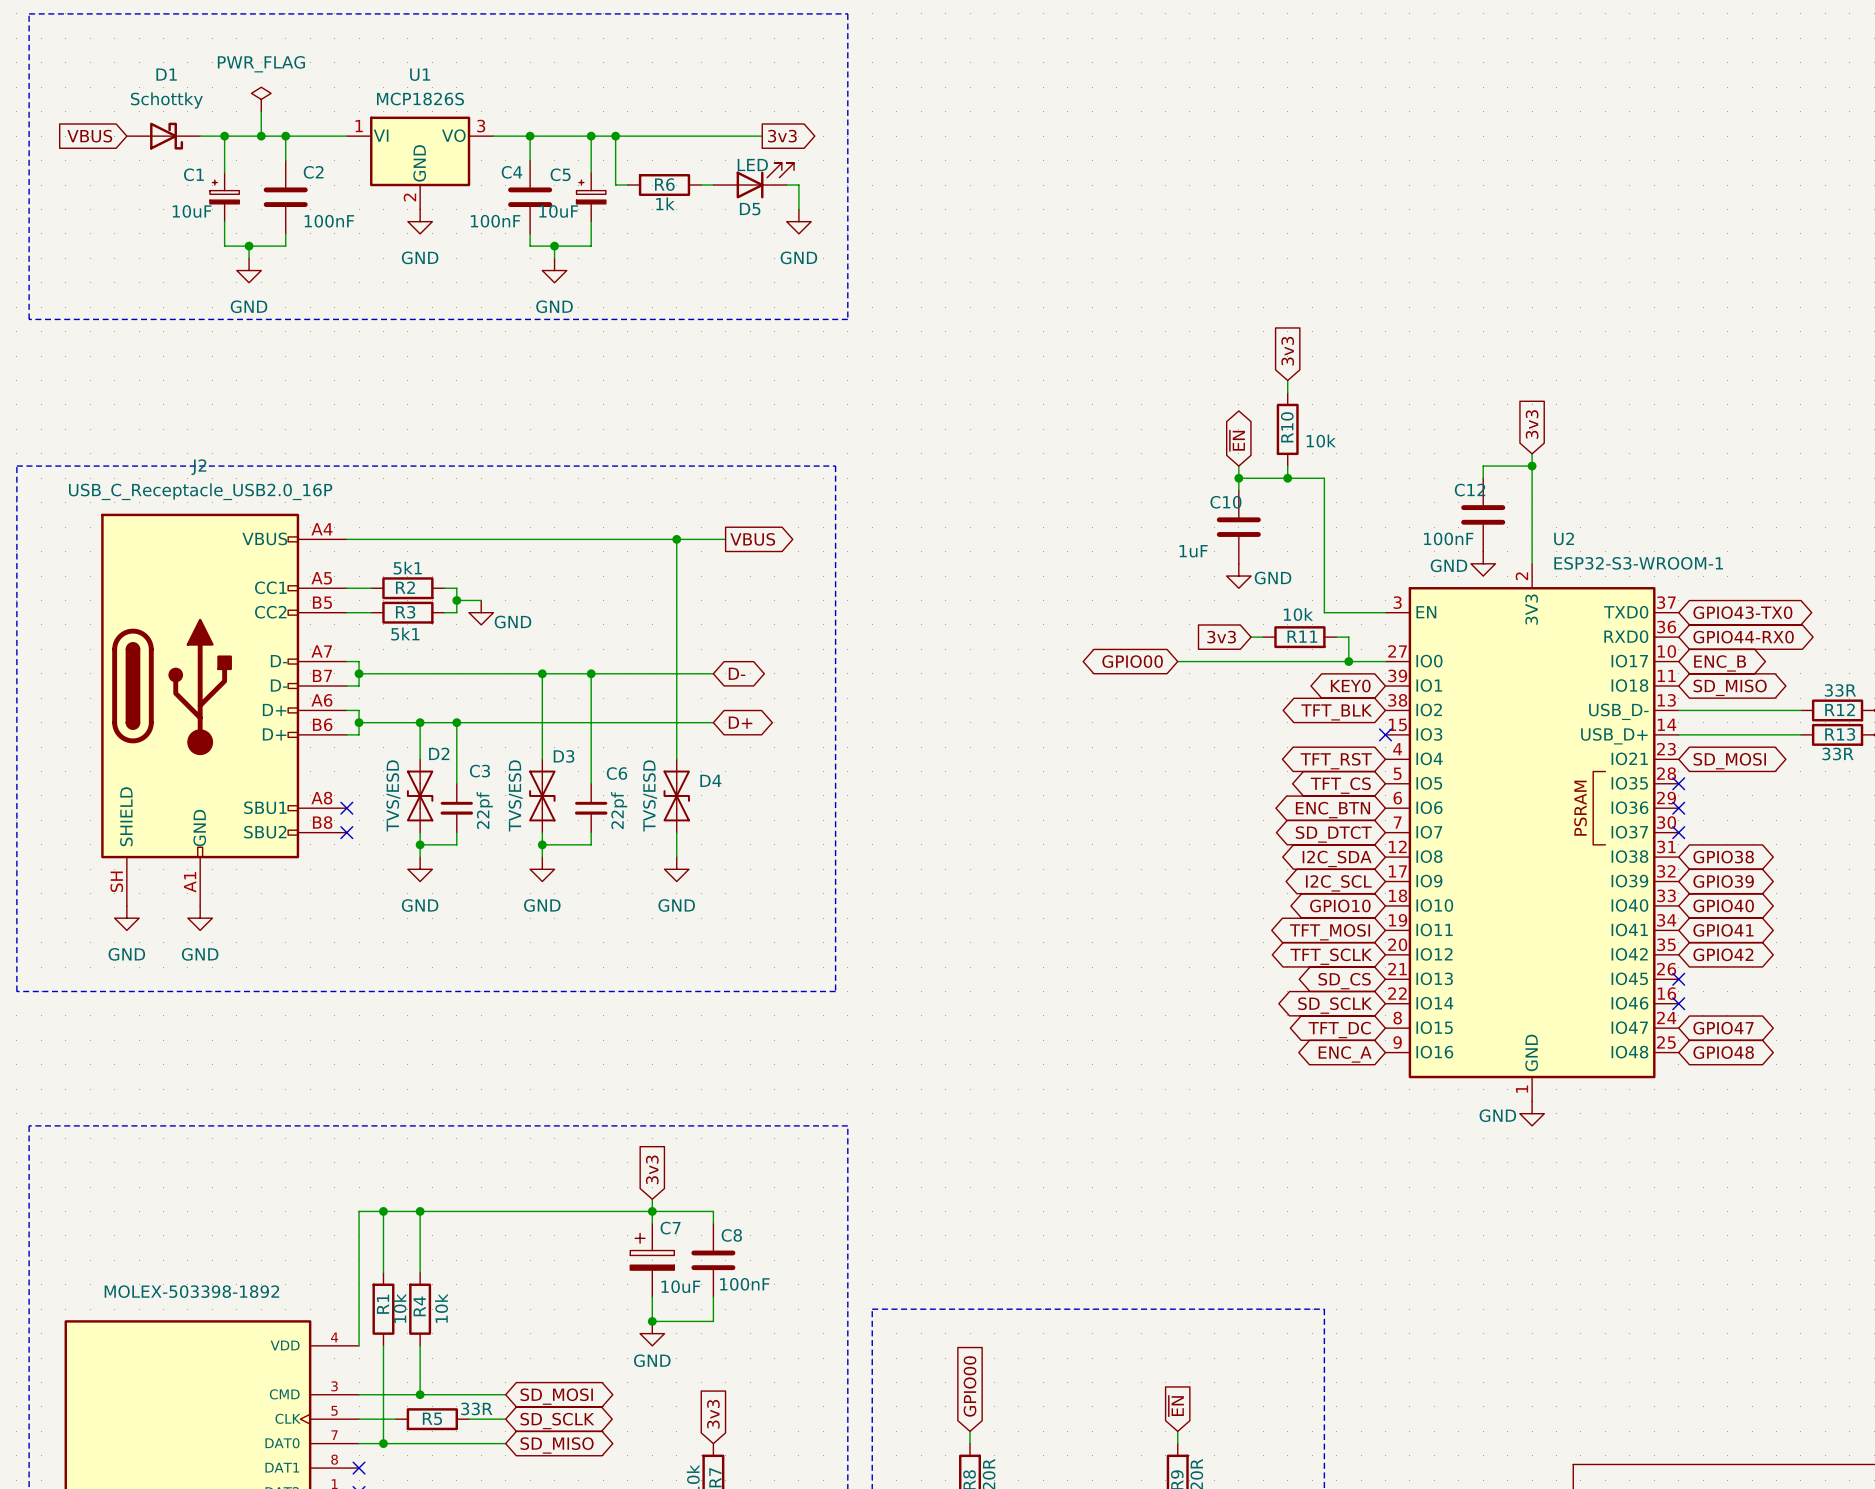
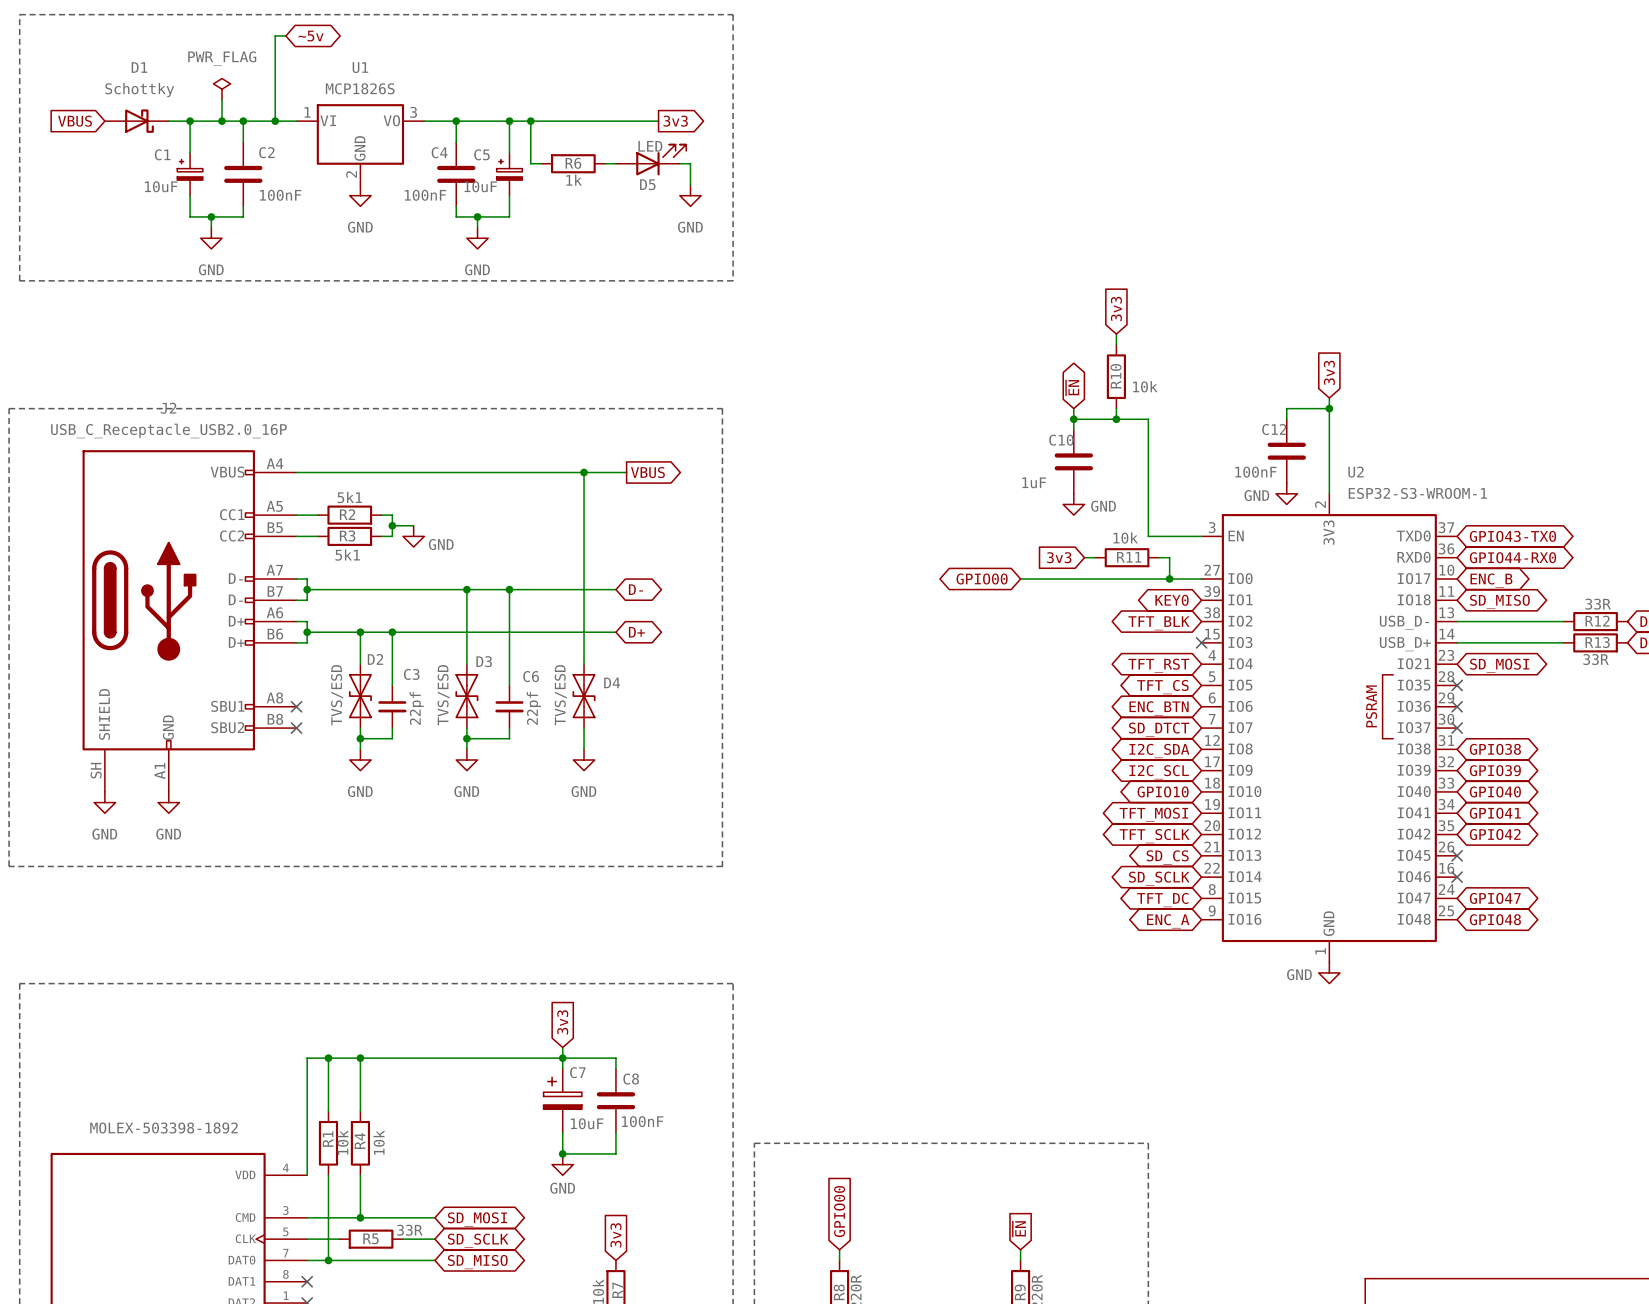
wire: none -> (285, 35) (275, 35) (275, 121)
global label: none -> ~5v (311, 36)
junction: none -> (275, 121)

